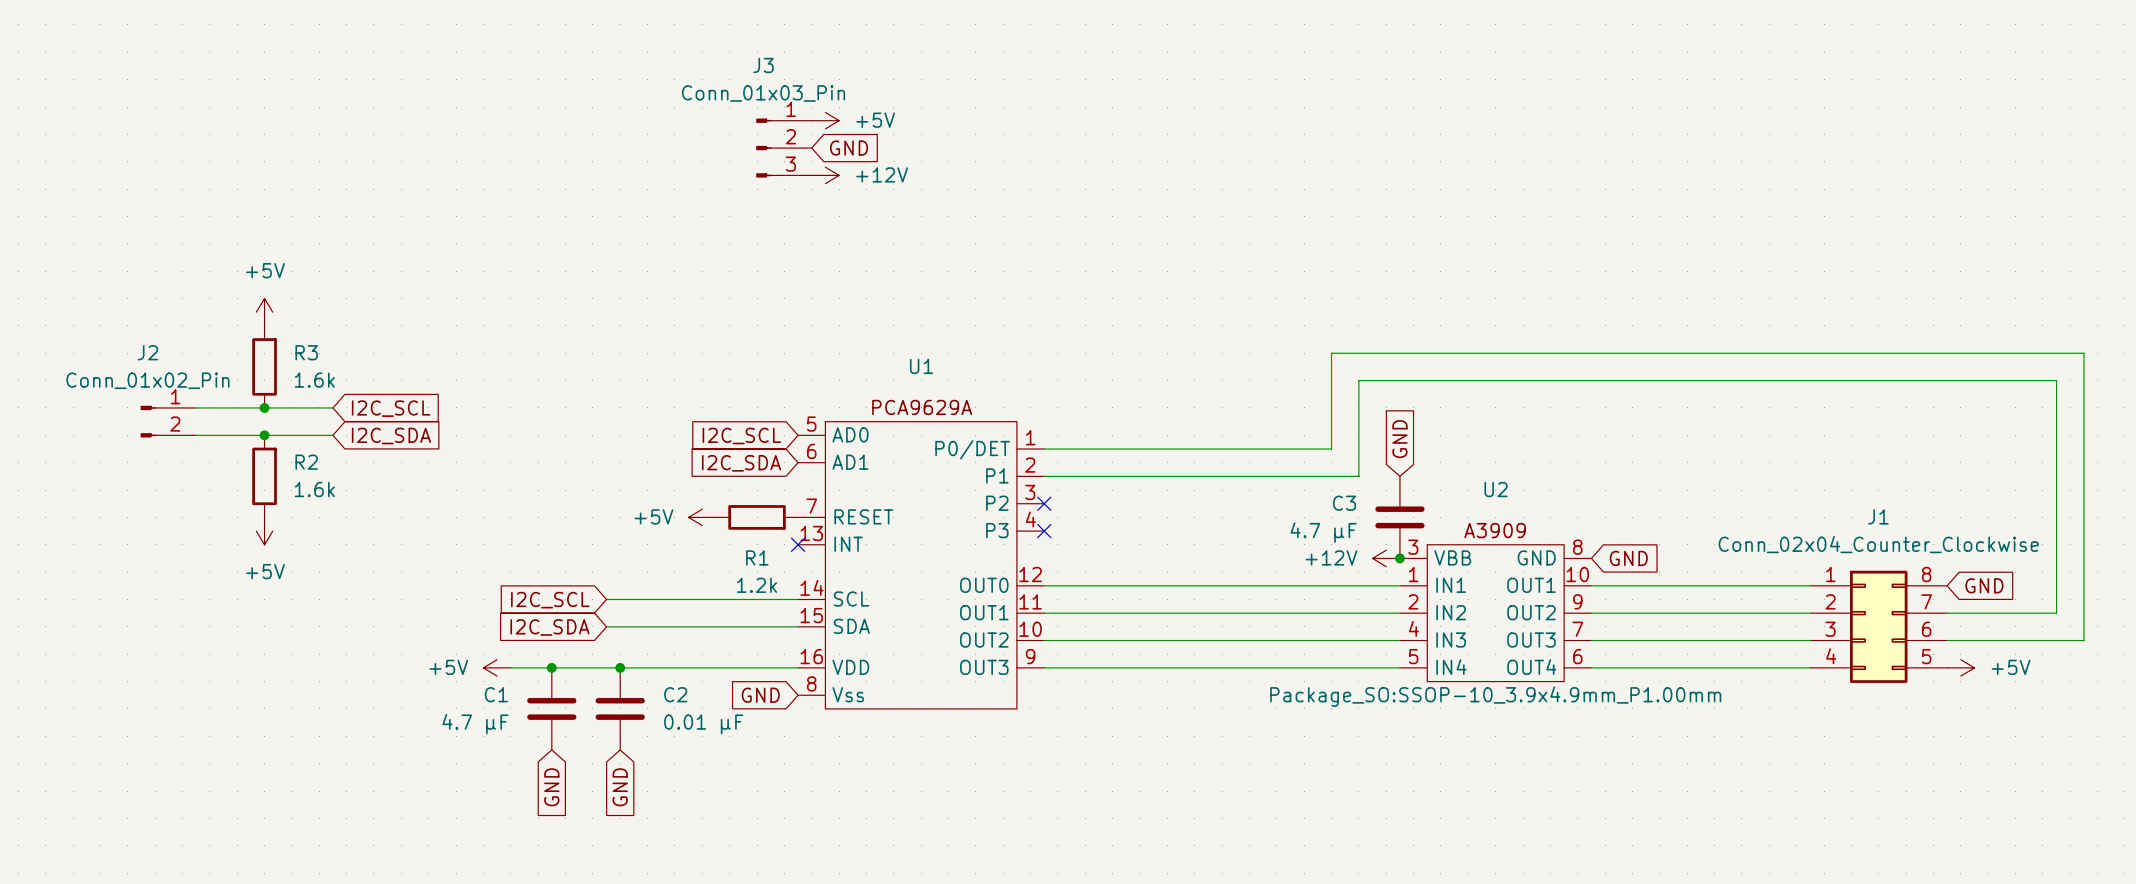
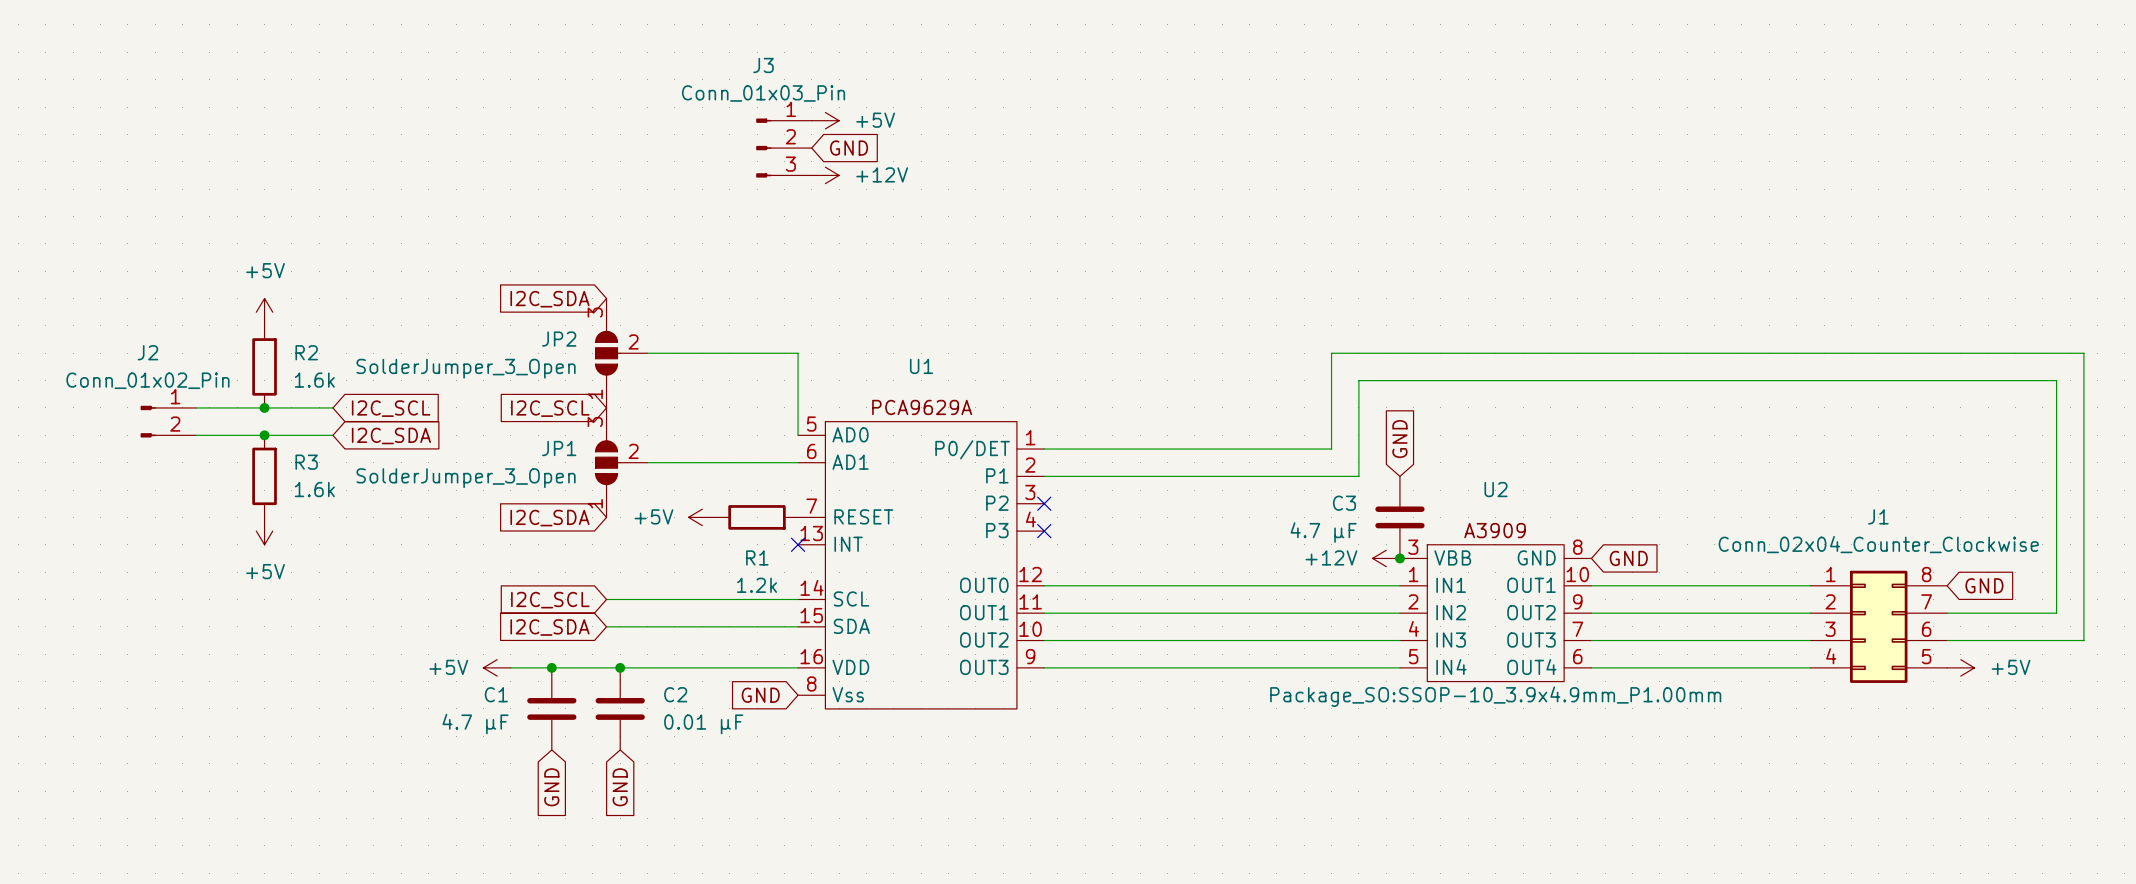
global label: none -> I2C_SDA (550, 299)
R3 name: R3 (306, 352) -> R2 (306, 352)
JP2: none -> SolderJumper_3_Open (621, 353)
wire: none -> (647, 353) (798, 353) (798, 435)
global label position: I2C_SCL (741, 435) -> I2C_SCL (550, 408)
R2 name: R2 (306, 462) -> R3 (306, 462)
JP1: none -> SolderJumper_3_Open (621, 462)
wire: none -> (647, 462) (798, 462)
global label: I2C_SDA (741, 463) -> none
global label: none -> I2C_SDA (550, 518)

